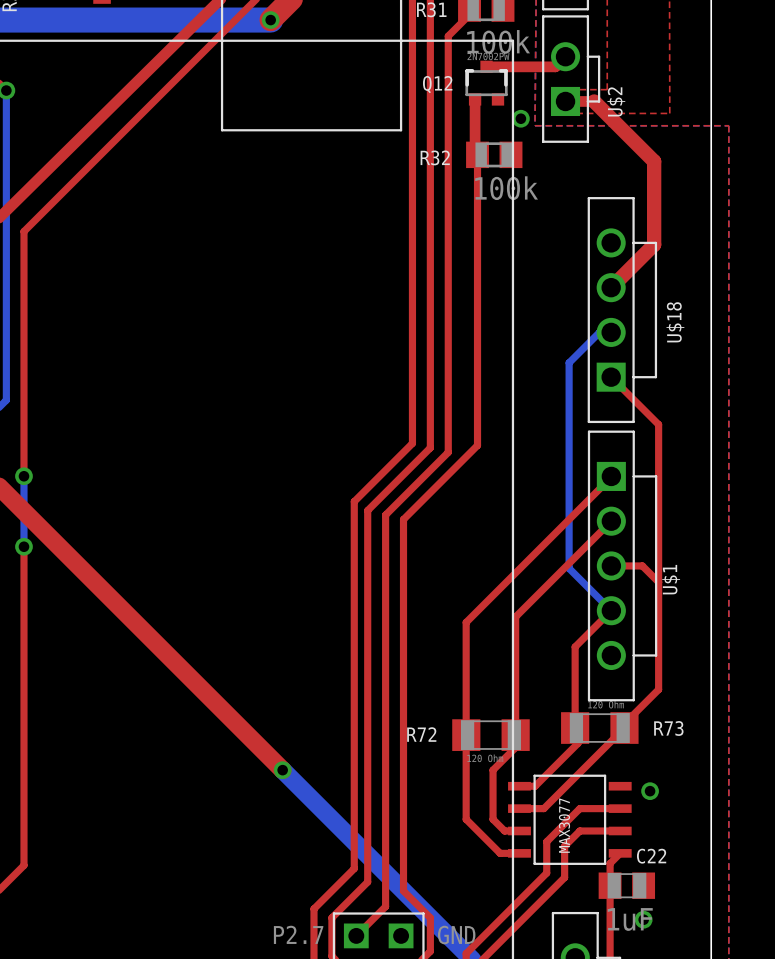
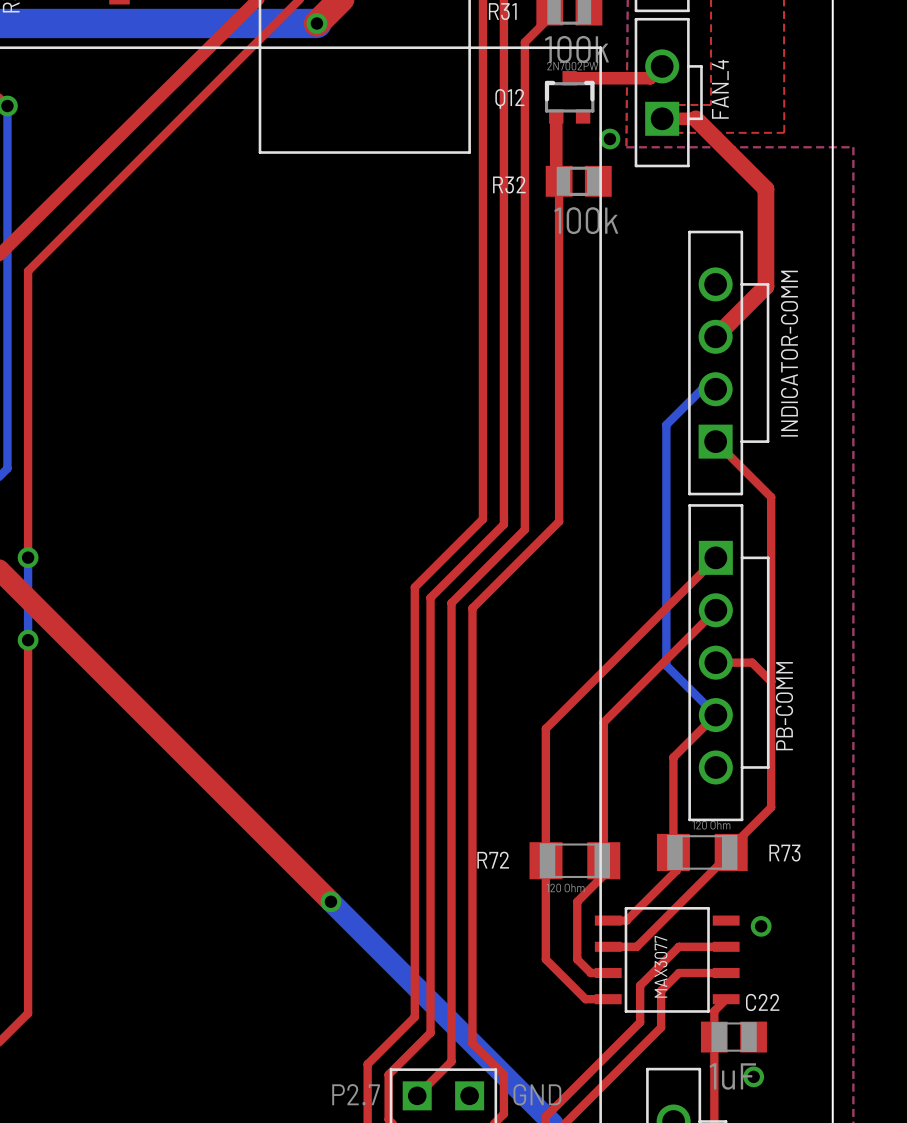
U$2 name: U$2 (616, 101) -> FAN_4 (720, 89)
U$18 name: U$18 (675, 322) -> INDICATOR-COMM (789, 353)
U$1 name: U$1 (671, 579) -> PB-COMM (784, 706)

